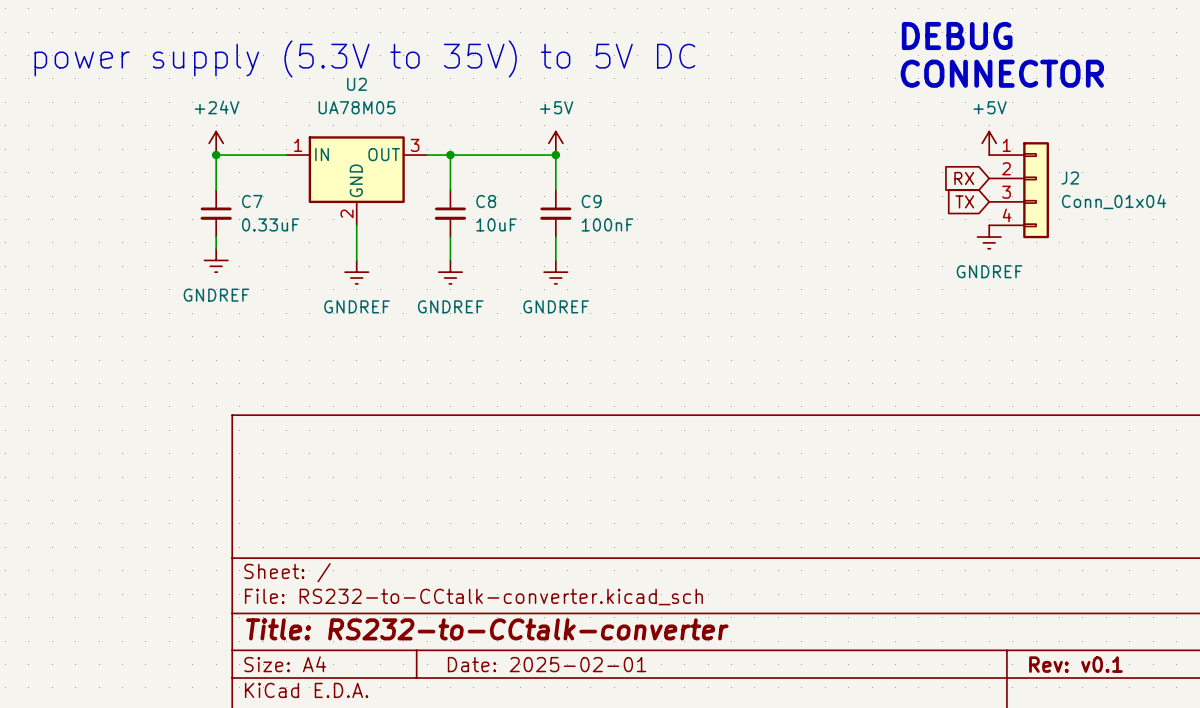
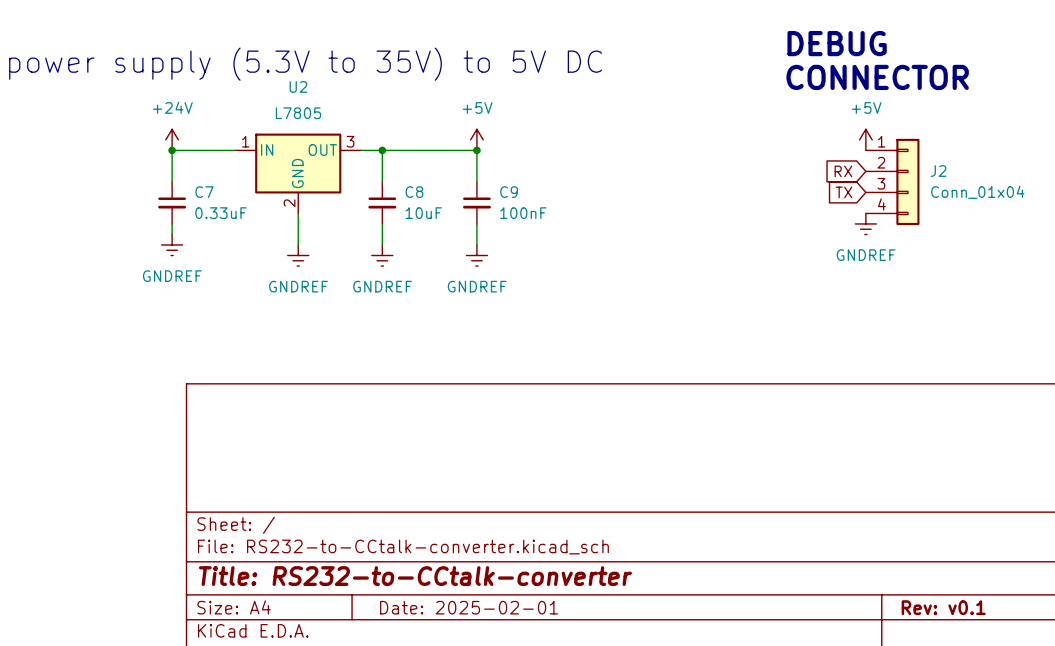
U2 value: UA78M05 (357, 107) -> L7805 (298, 113)

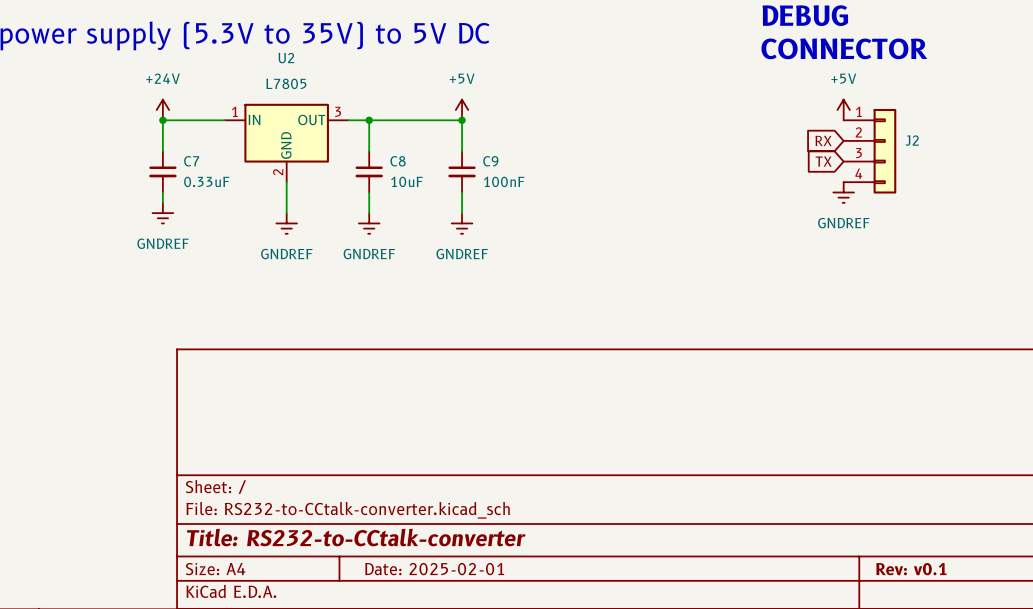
J2 value: Conn_01x04 (977, 192) -> none

